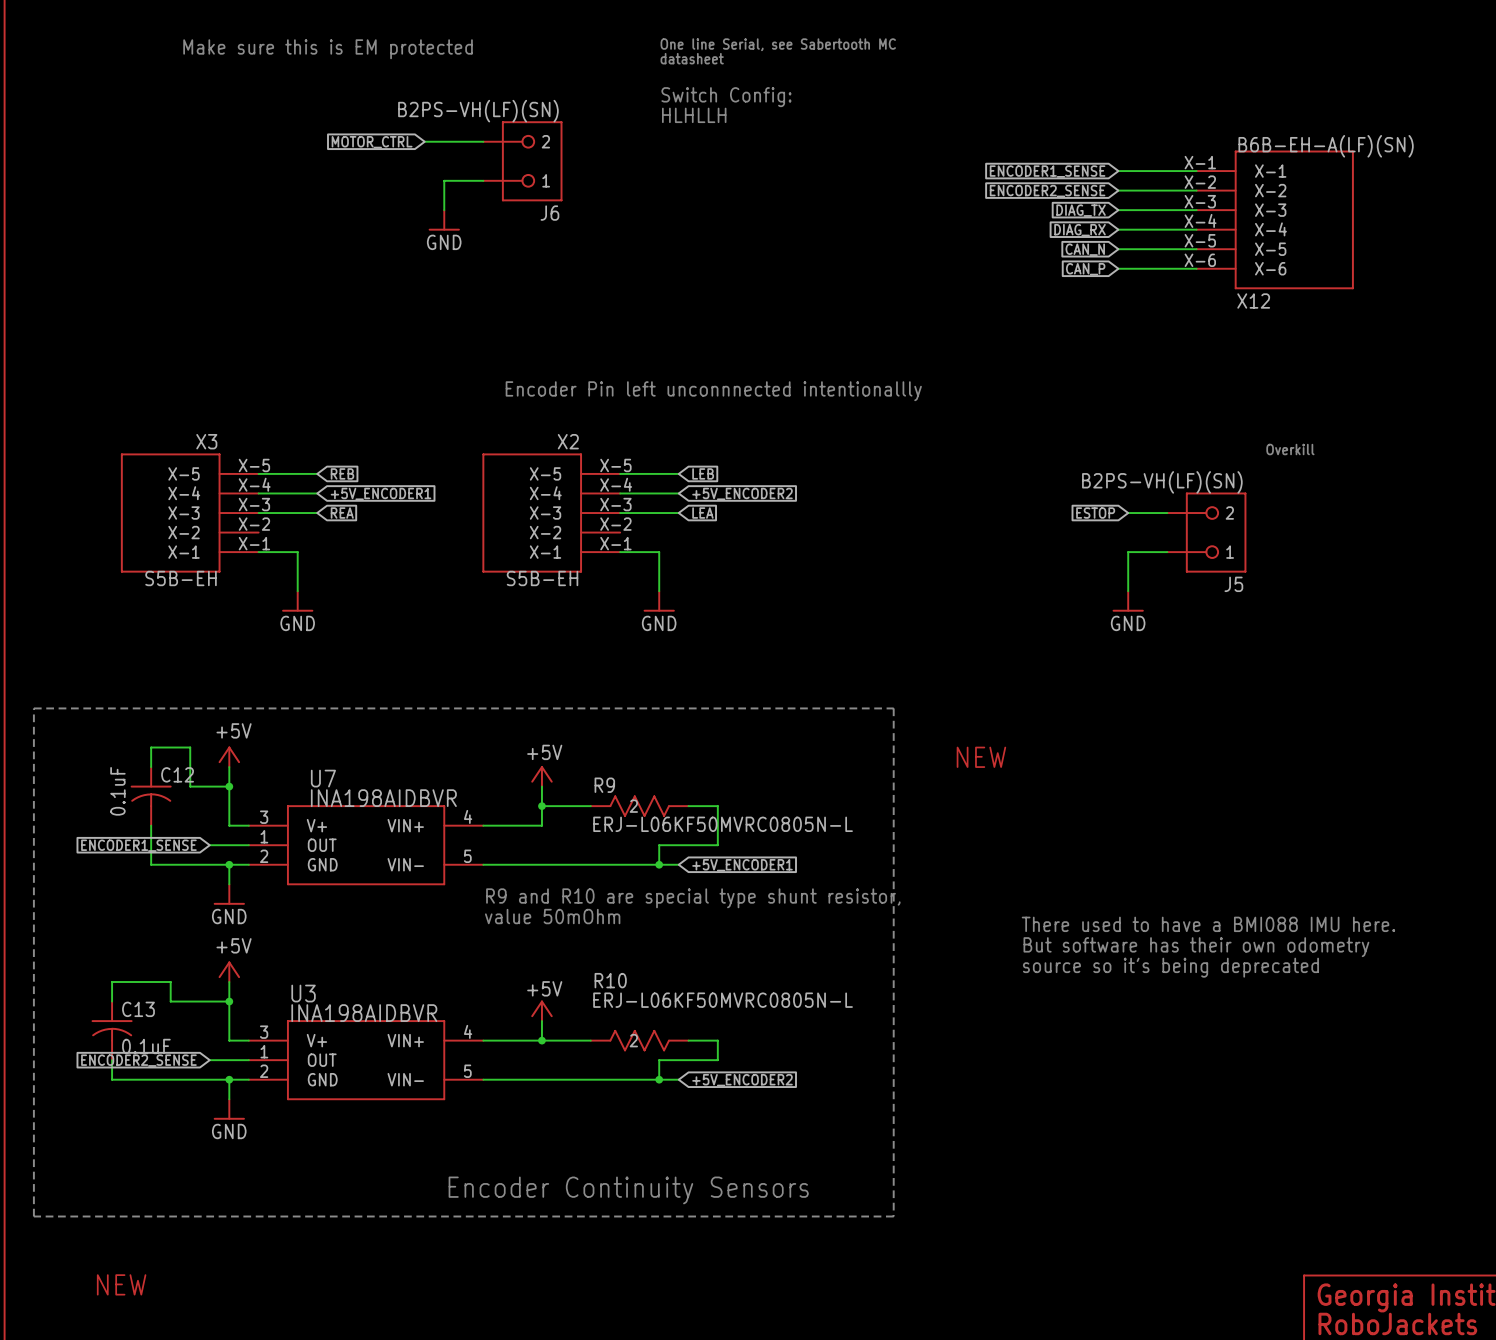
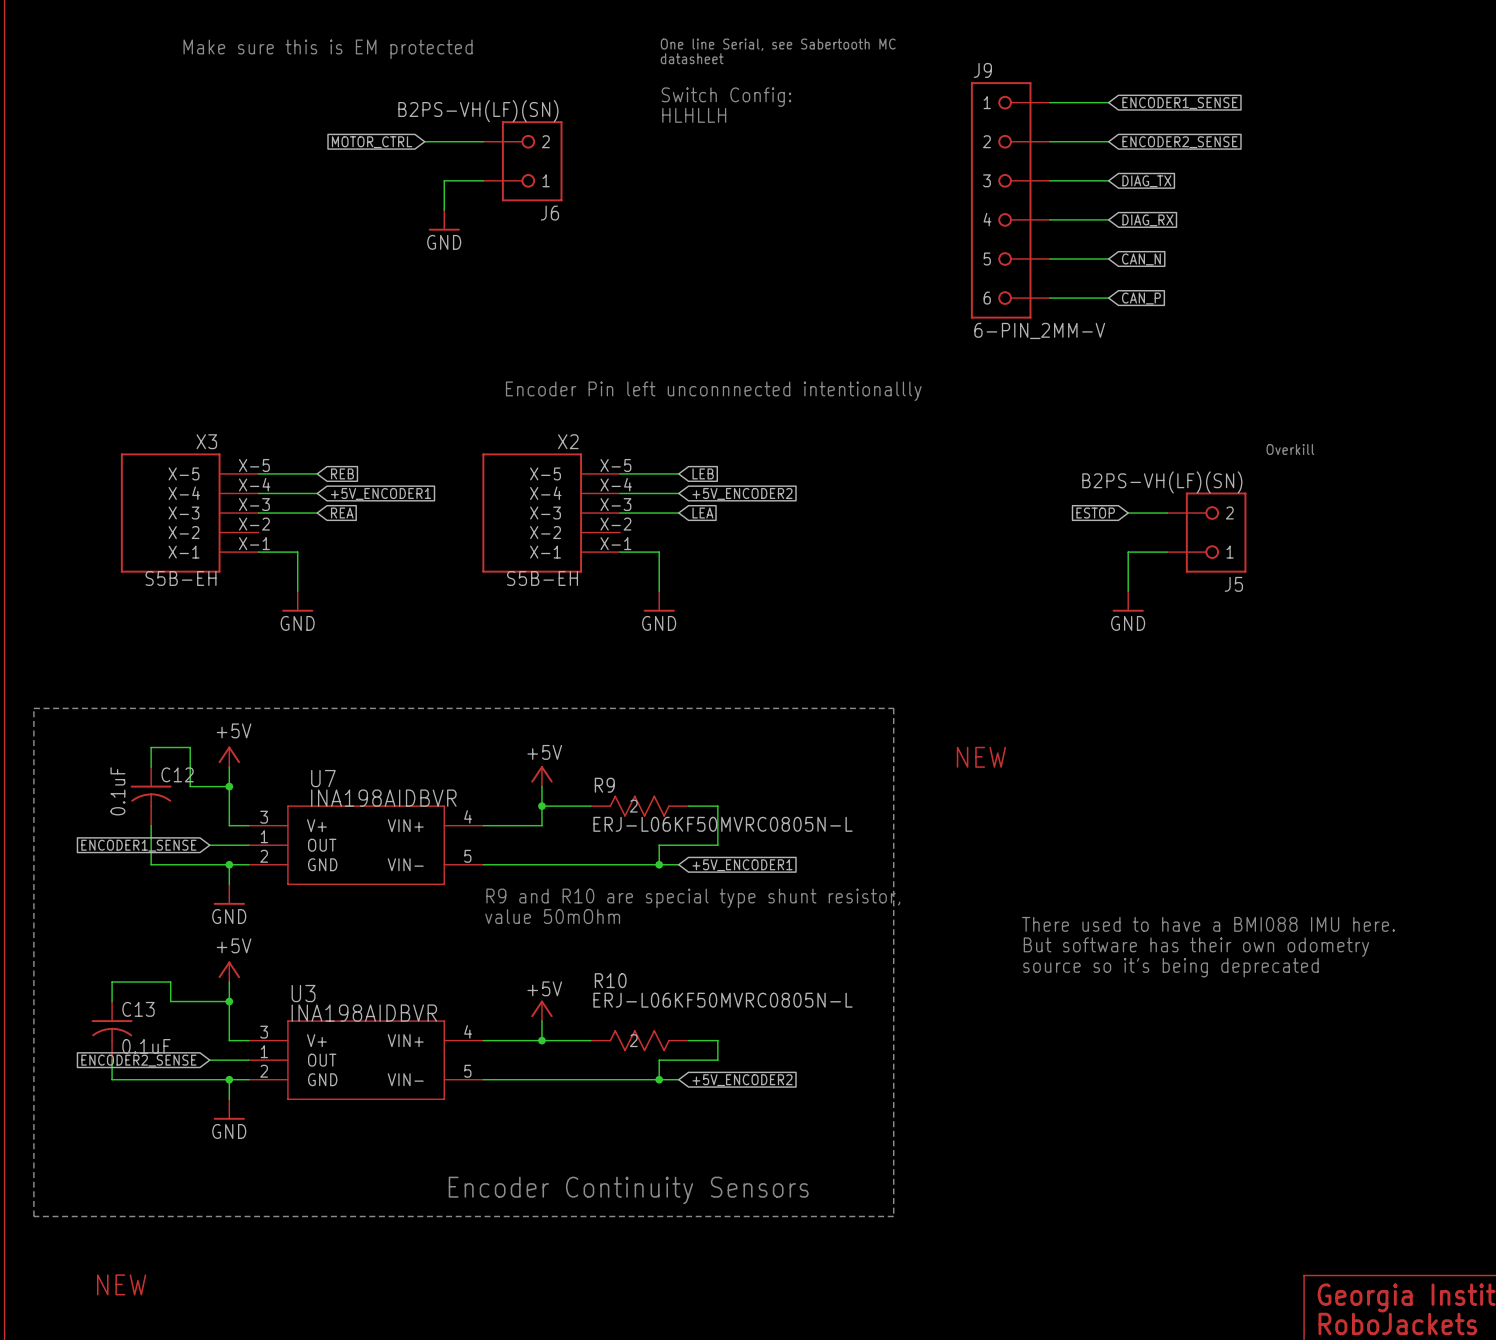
wire: none -> (1050, 102) (1108, 102)
wire: none -> (1050, 141) (1108, 141)
global label rotation: 0° (1047, 171) -> 180° (1179, 103)
global label position: ENCODER1_SENSE (1047, 171) -> ENCODER1_SENSE (1179, 103)
wire: (1118, 171) (1196, 171) -> none
wire: none -> (1050, 180) (1108, 180)
wire: (1118, 190) (1196, 190) -> none
global label rotation: 0° (1047, 191) -> 180° (1179, 142)
J9: none -> 6-PIN_2MM-V (1010, 200)
global label rotation: 0° (1081, 210) -> 180° (1146, 181)
wire: (1118, 210) (1196, 210) -> none
wire: none -> (1050, 219) (1108, 219)
X12: B6B-EH-A(LF)(SN) (1275, 219) -> none
wire: (1118, 229) (1196, 229) -> none
global label rotation: 0° (1080, 230) -> 180° (1147, 220)
global label rotation: 0° (1085, 249) -> 180° (1141, 259)
wire: (1118, 249) (1196, 249) -> none
wire: none -> (1050, 258) (1108, 258)
wire: (1118, 268) (1196, 268) -> none
global label rotation: 0° (1085, 269) -> 180° (1141, 298)
wire: none -> (1050, 298) (1108, 298)

